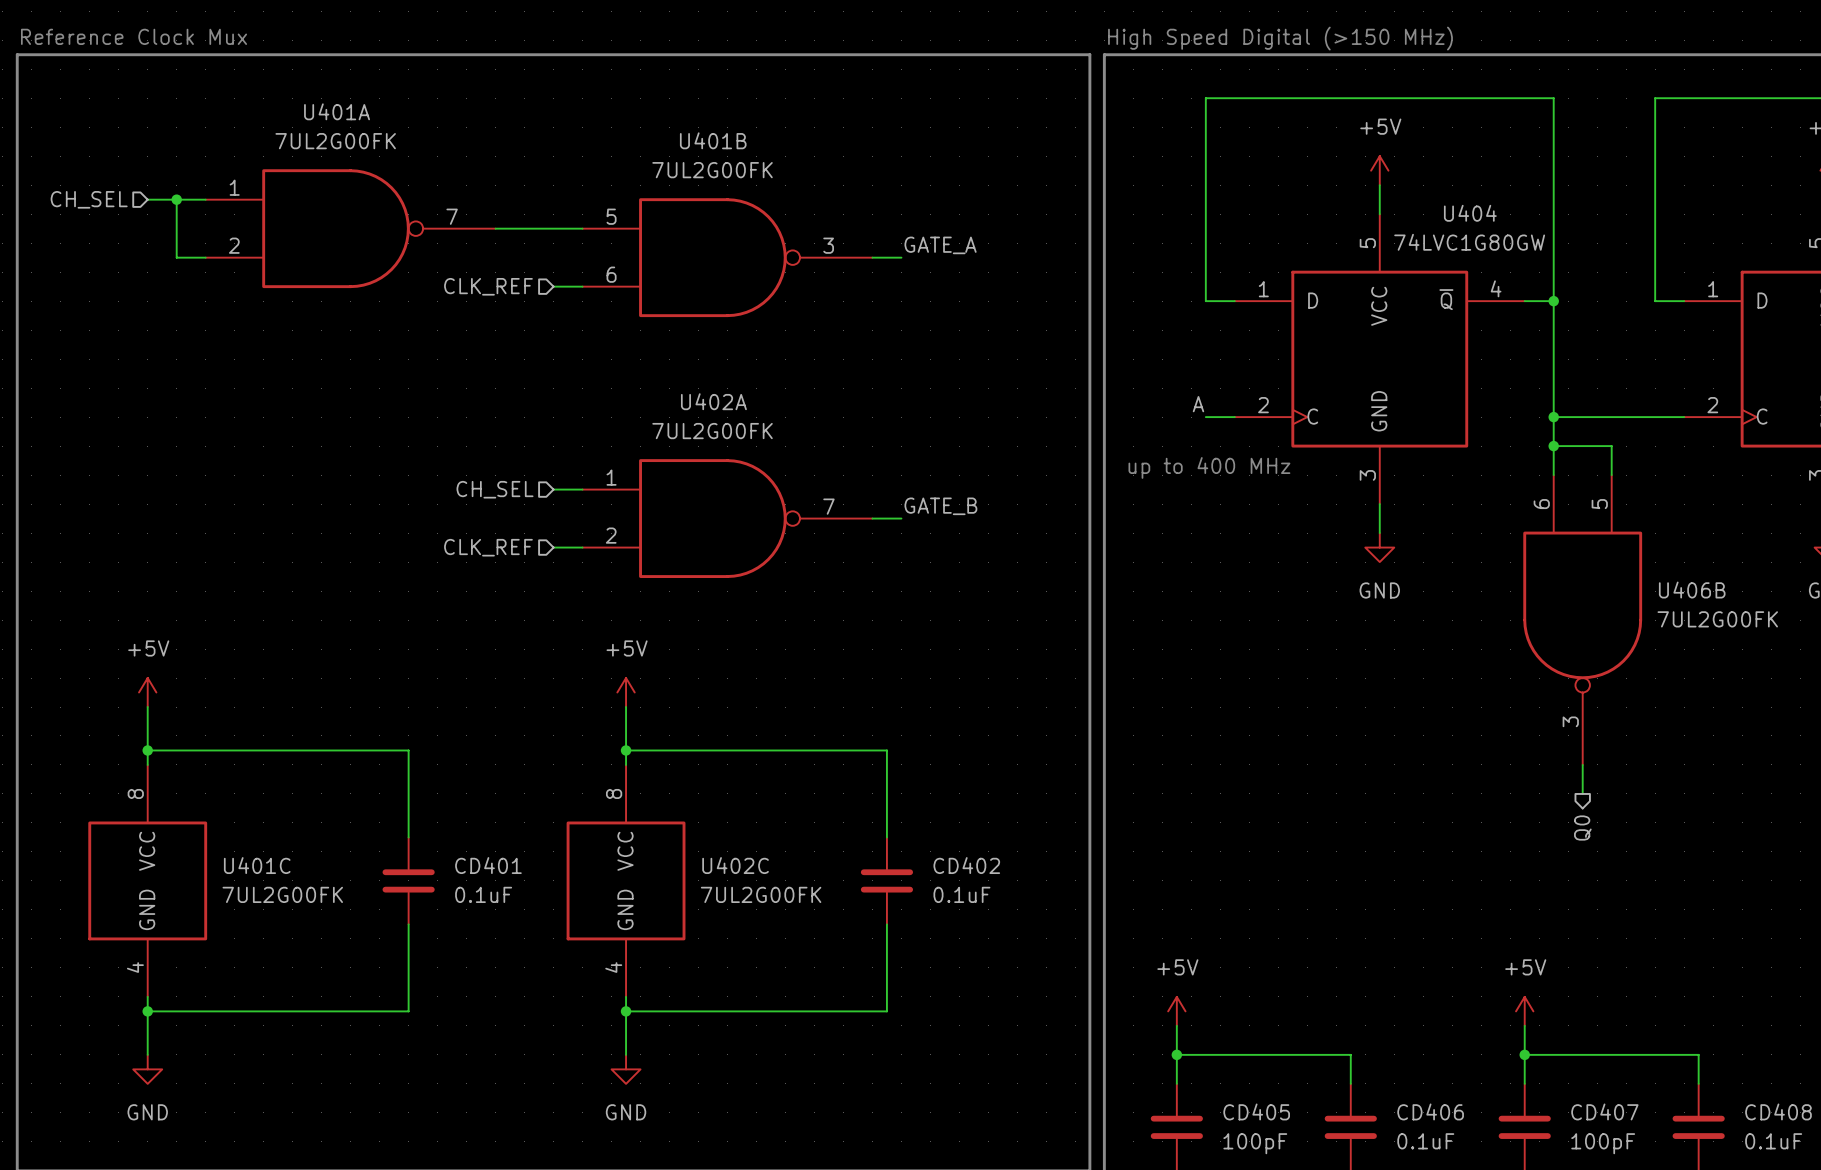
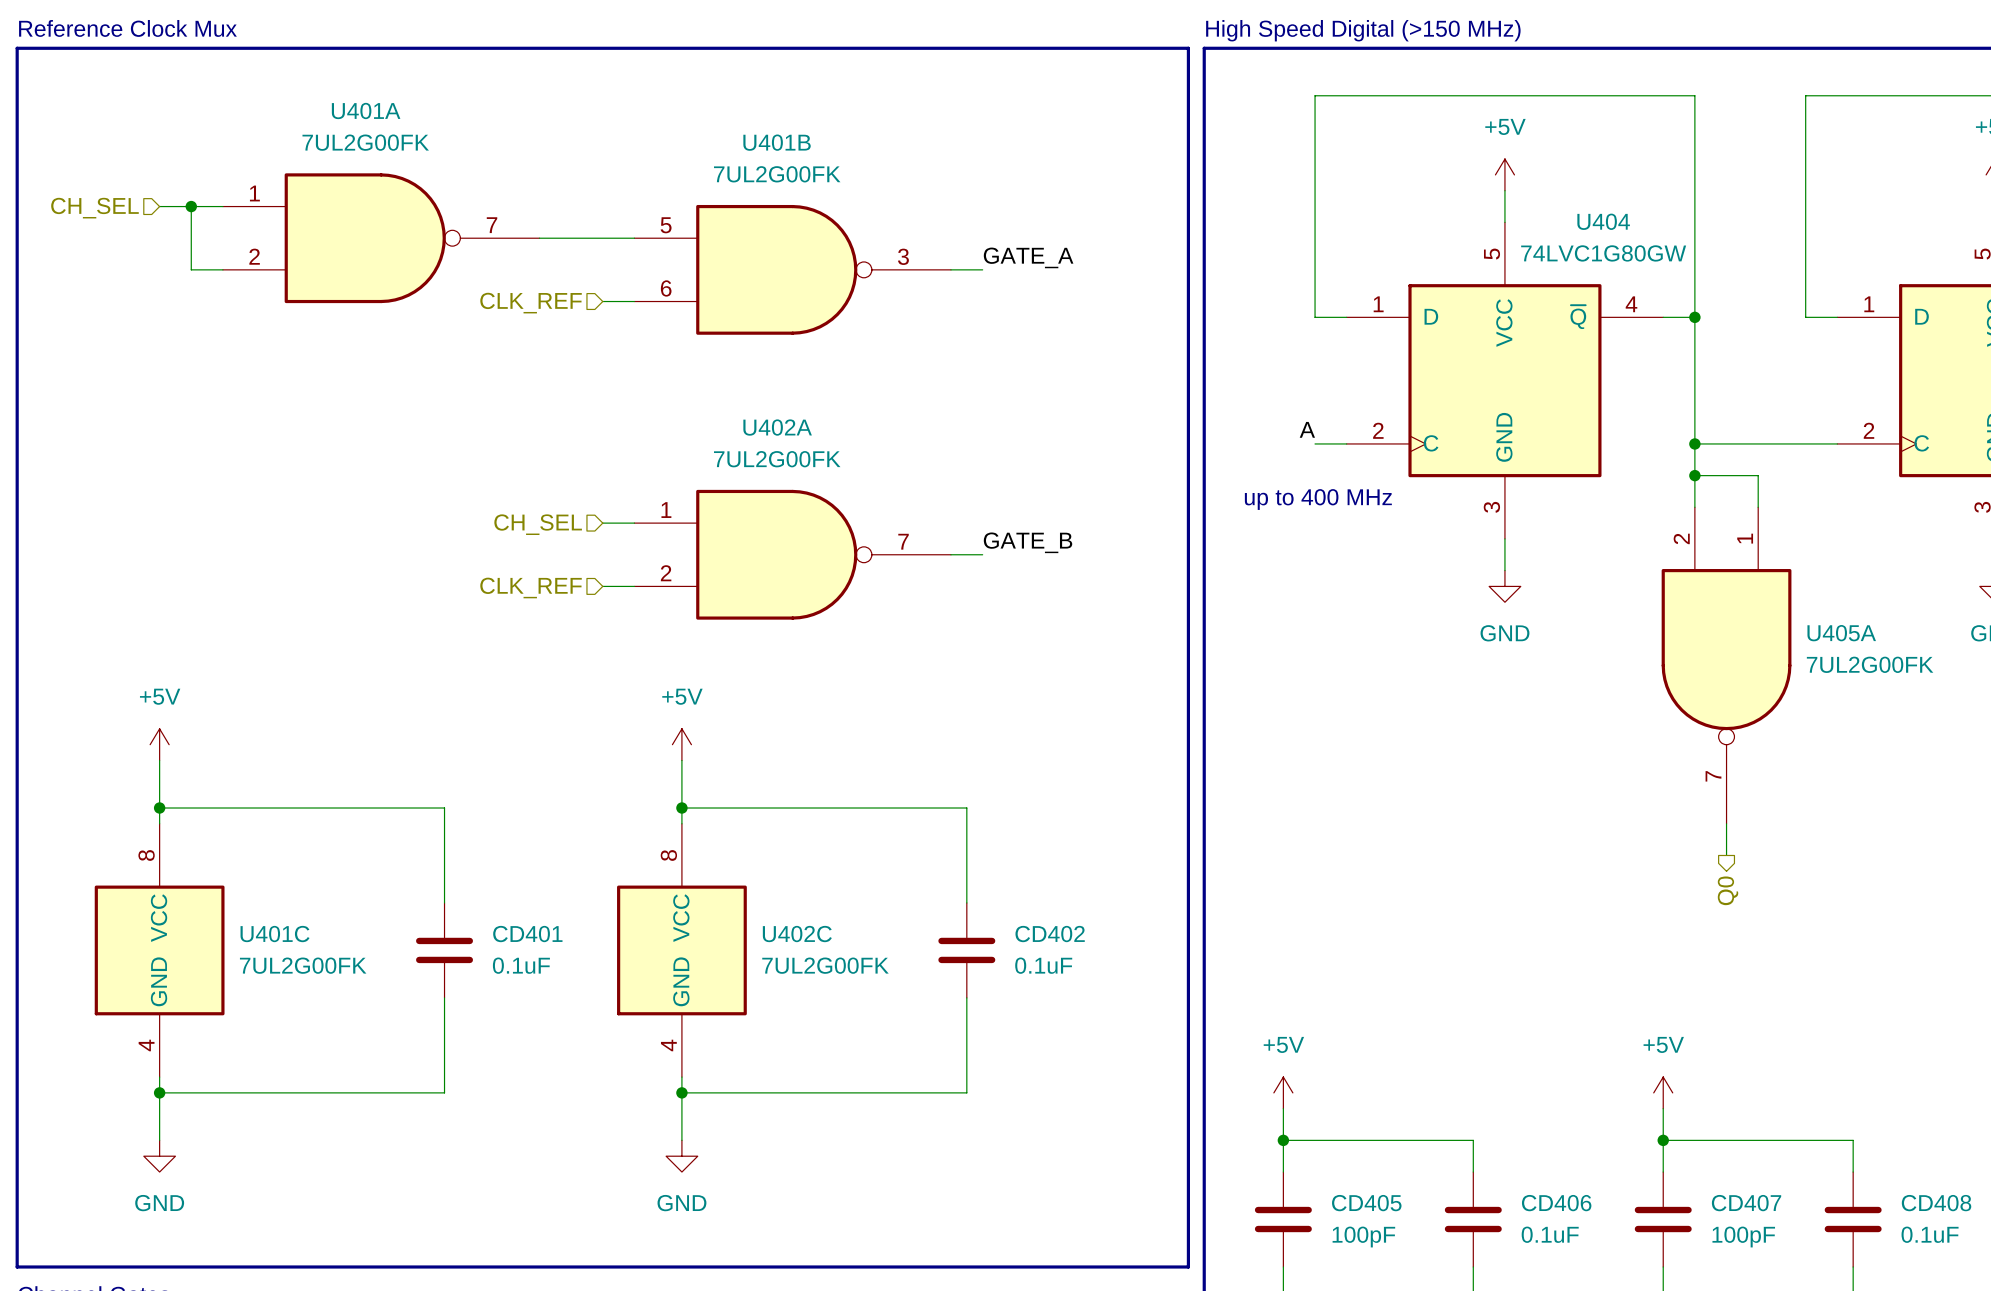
U406B pin number: 6 (1541, 504) -> 2 (1681, 538)
U406B pin number: 5 (1599, 504) -> 1 (1745, 538)
U406B name: U406B (1692, 590) -> U405A (1841, 633)
U406B pin number: 3 (1570, 721) -> 7 (1713, 776)

